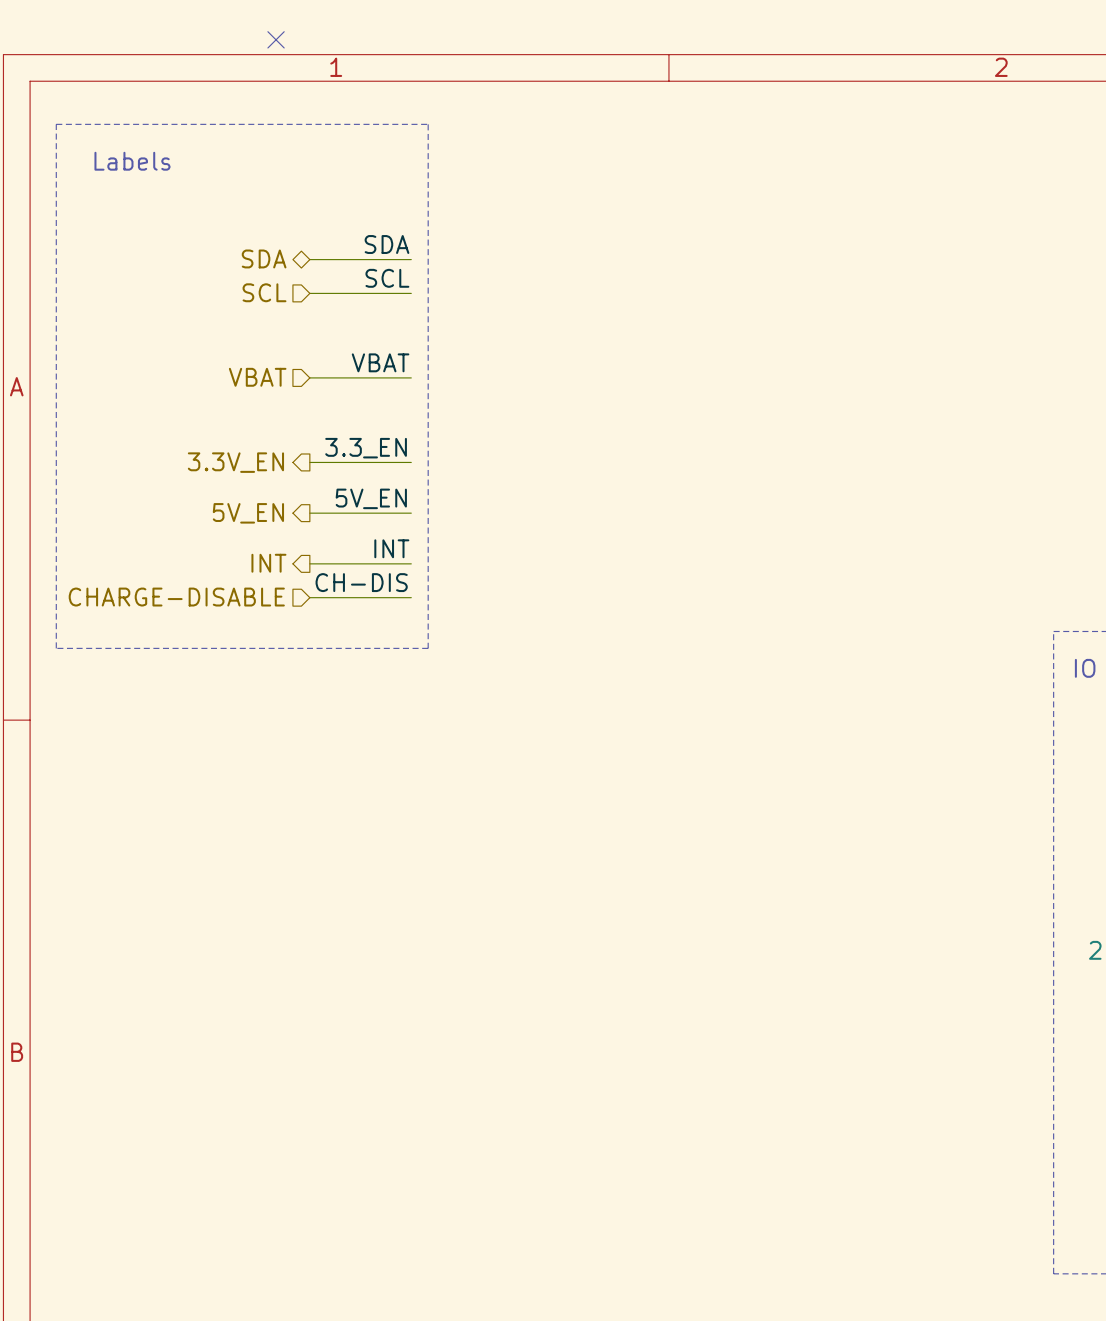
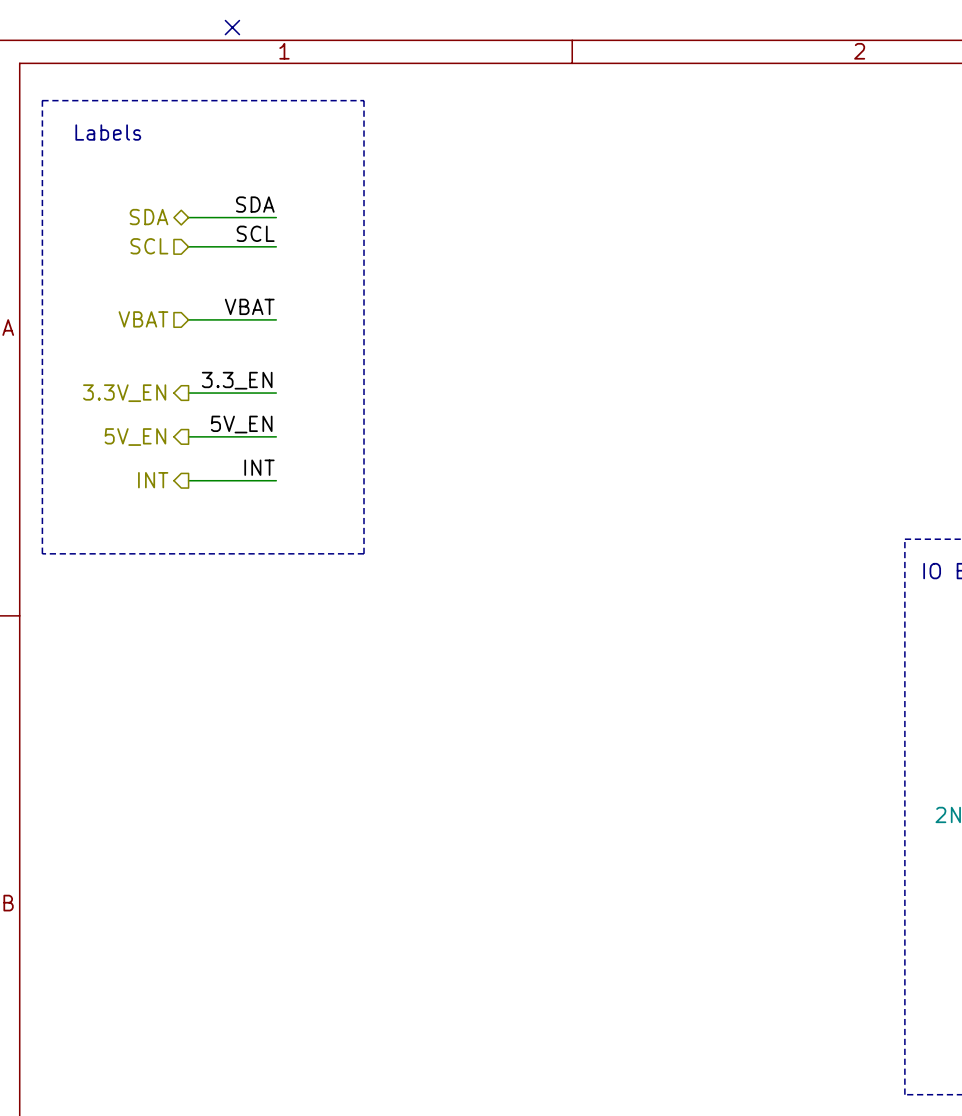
label position: SDA (387, 244) -> SDA (255, 204)
hierarchical label position: SDA (264, 258) -> SDA (149, 217)
wire: (326, 259) (411, 259) -> (188, 217) (261, 217)
label position: SCL (387, 278) -> SCL (255, 233)
hierarchical label position: SCL (264, 292) -> SCL (149, 246)
wire: (326, 293) (411, 293) -> (188, 246) (261, 246)
label position: VBAT (380, 362) -> VBAT (249, 306)
hierarchical label position: VBAT (257, 377) -> VBAT (143, 319)
wire: (326, 377) (411, 377) -> (188, 319) (261, 319)
label position: 3.3_EN (366, 448) -> 3.3_EN (237, 380)
hierarchical label position: 3.3V_EN (235, 462) -> 3.3V_EN (124, 393)
wire: (326, 462) (411, 462) -> (188, 393) (261, 393)
label position: 5V_EN (371, 498) -> 5V_EN (241, 424)
hierarchical label position: 5V_EN (248, 513) -> 5V_EN (135, 437)
wire: (326, 513) (411, 513) -> (188, 436) (261, 436)
label position: INT (391, 548) -> INT (259, 467)
hierarchical label position: INT (268, 563) -> INT (153, 480)
wire: (326, 563) (411, 563) -> (188, 480) (261, 480)
label: CH-DIS (361, 582) -> none
hierarchical label: CHARGE-DISABLE (176, 597) -> none
wire: (309, 597) (411, 597) -> none

